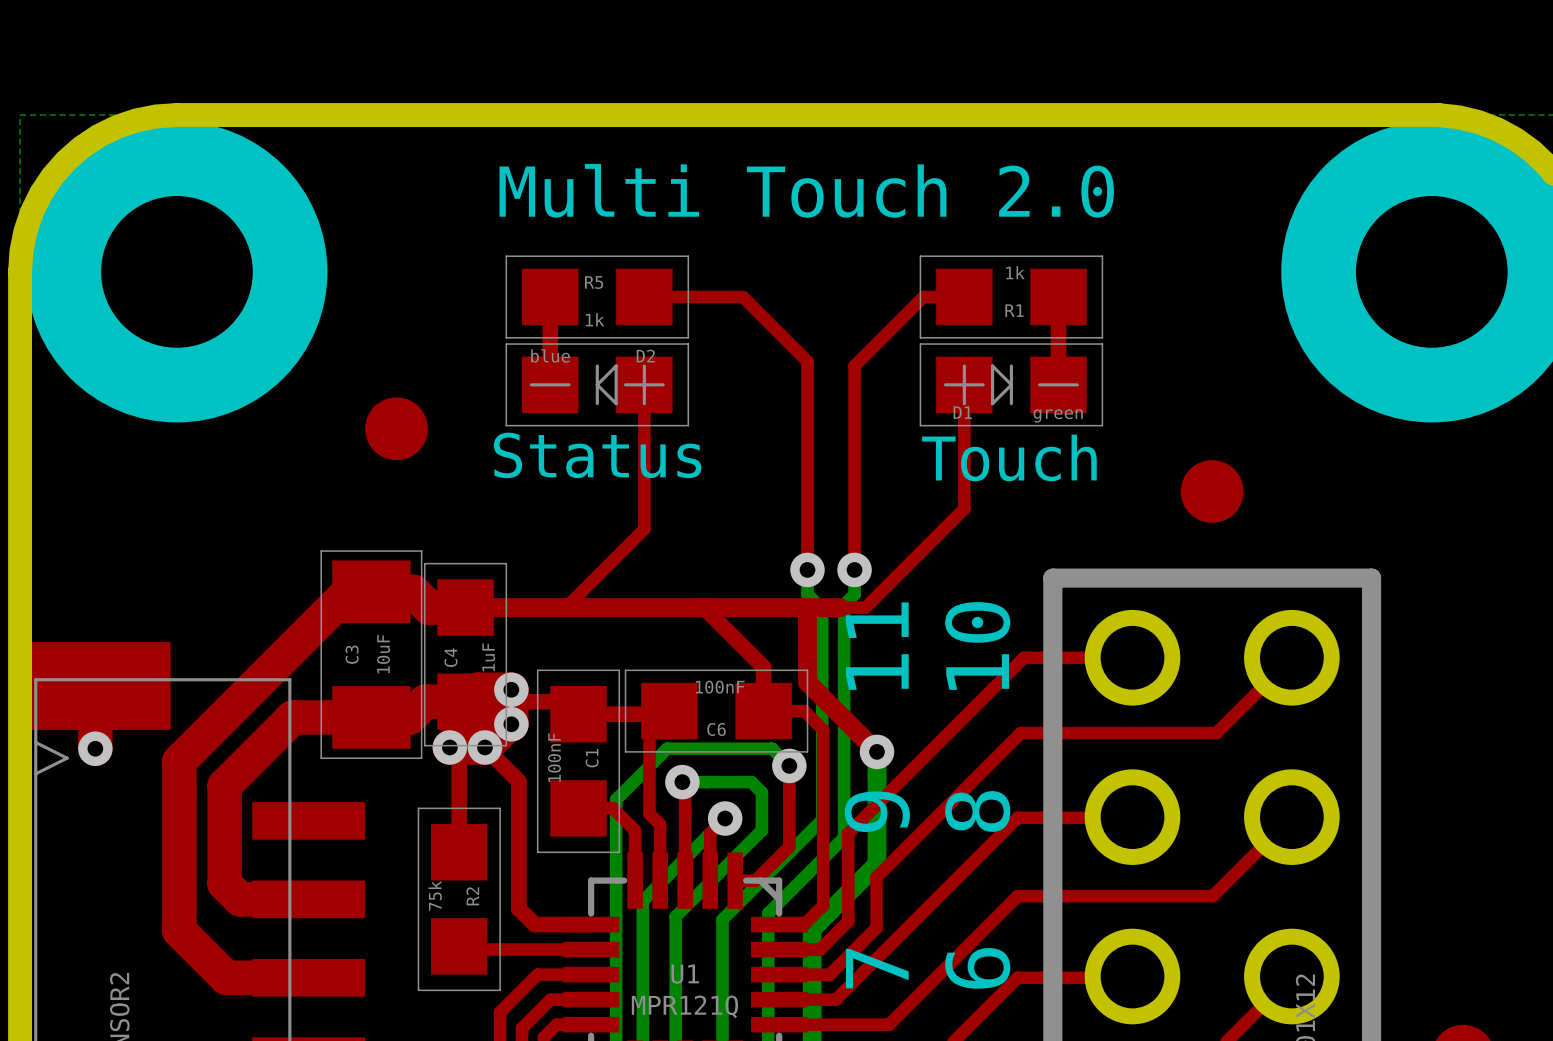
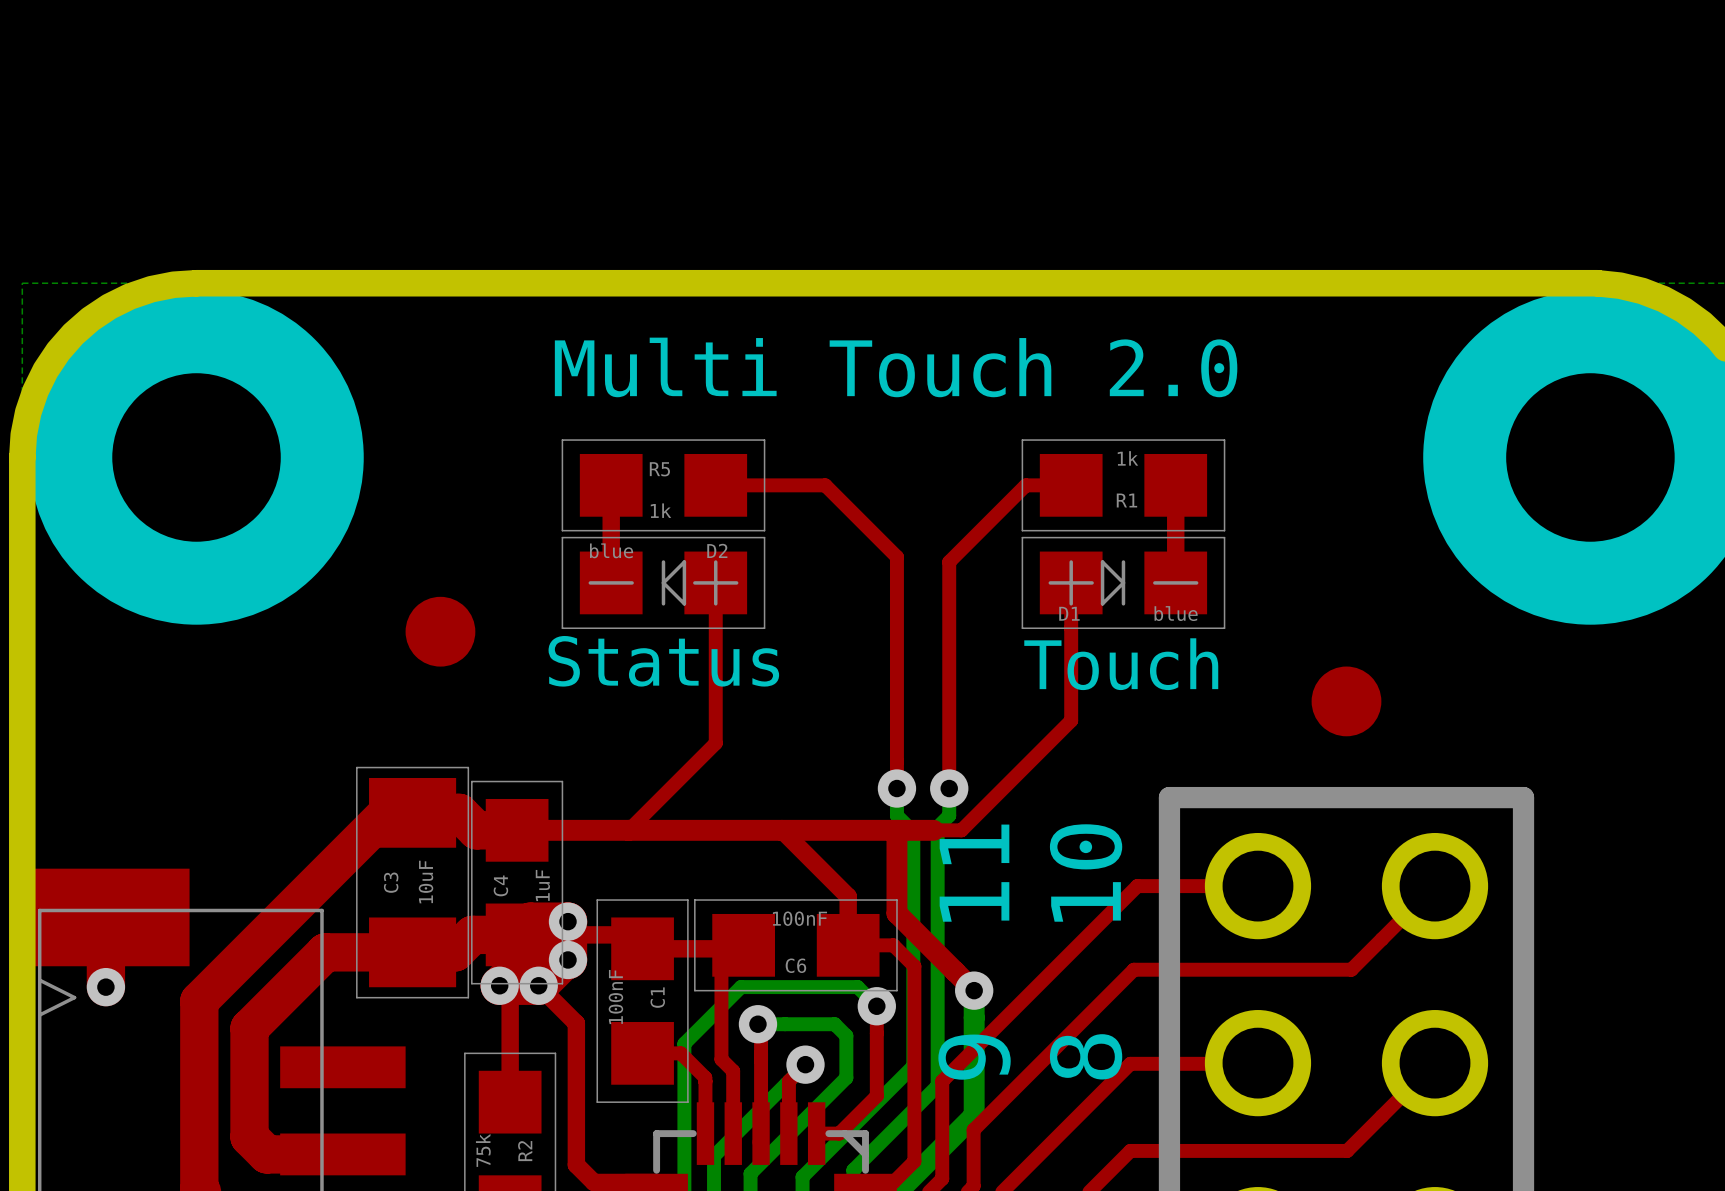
D1 value: green (1058, 415) -> blue (1176, 613)

